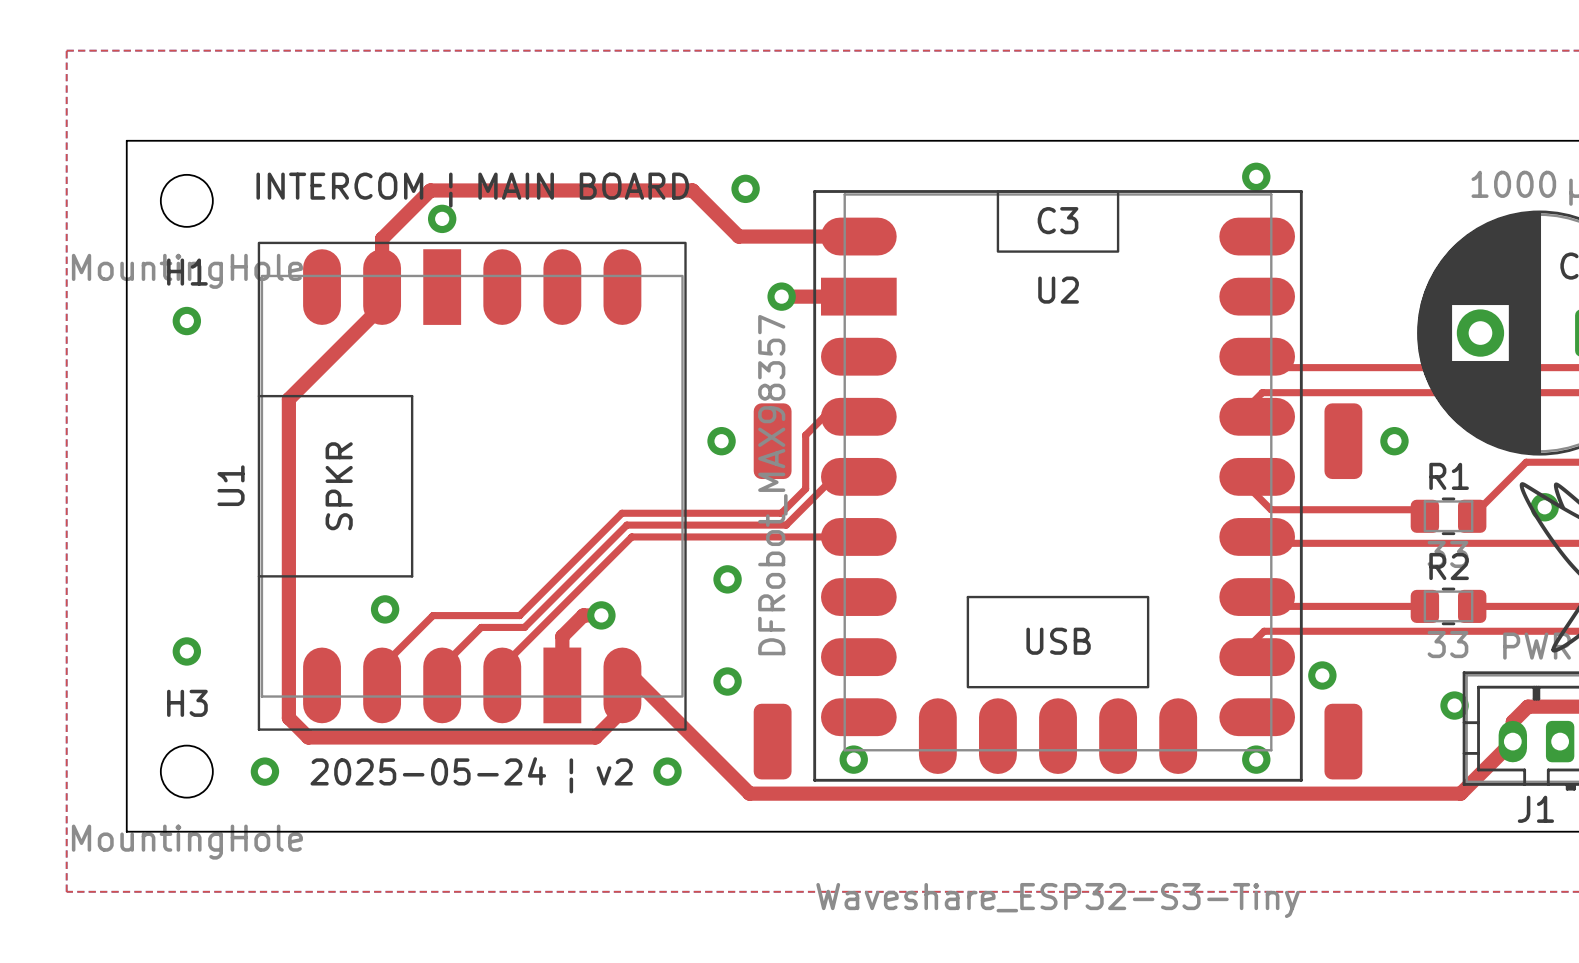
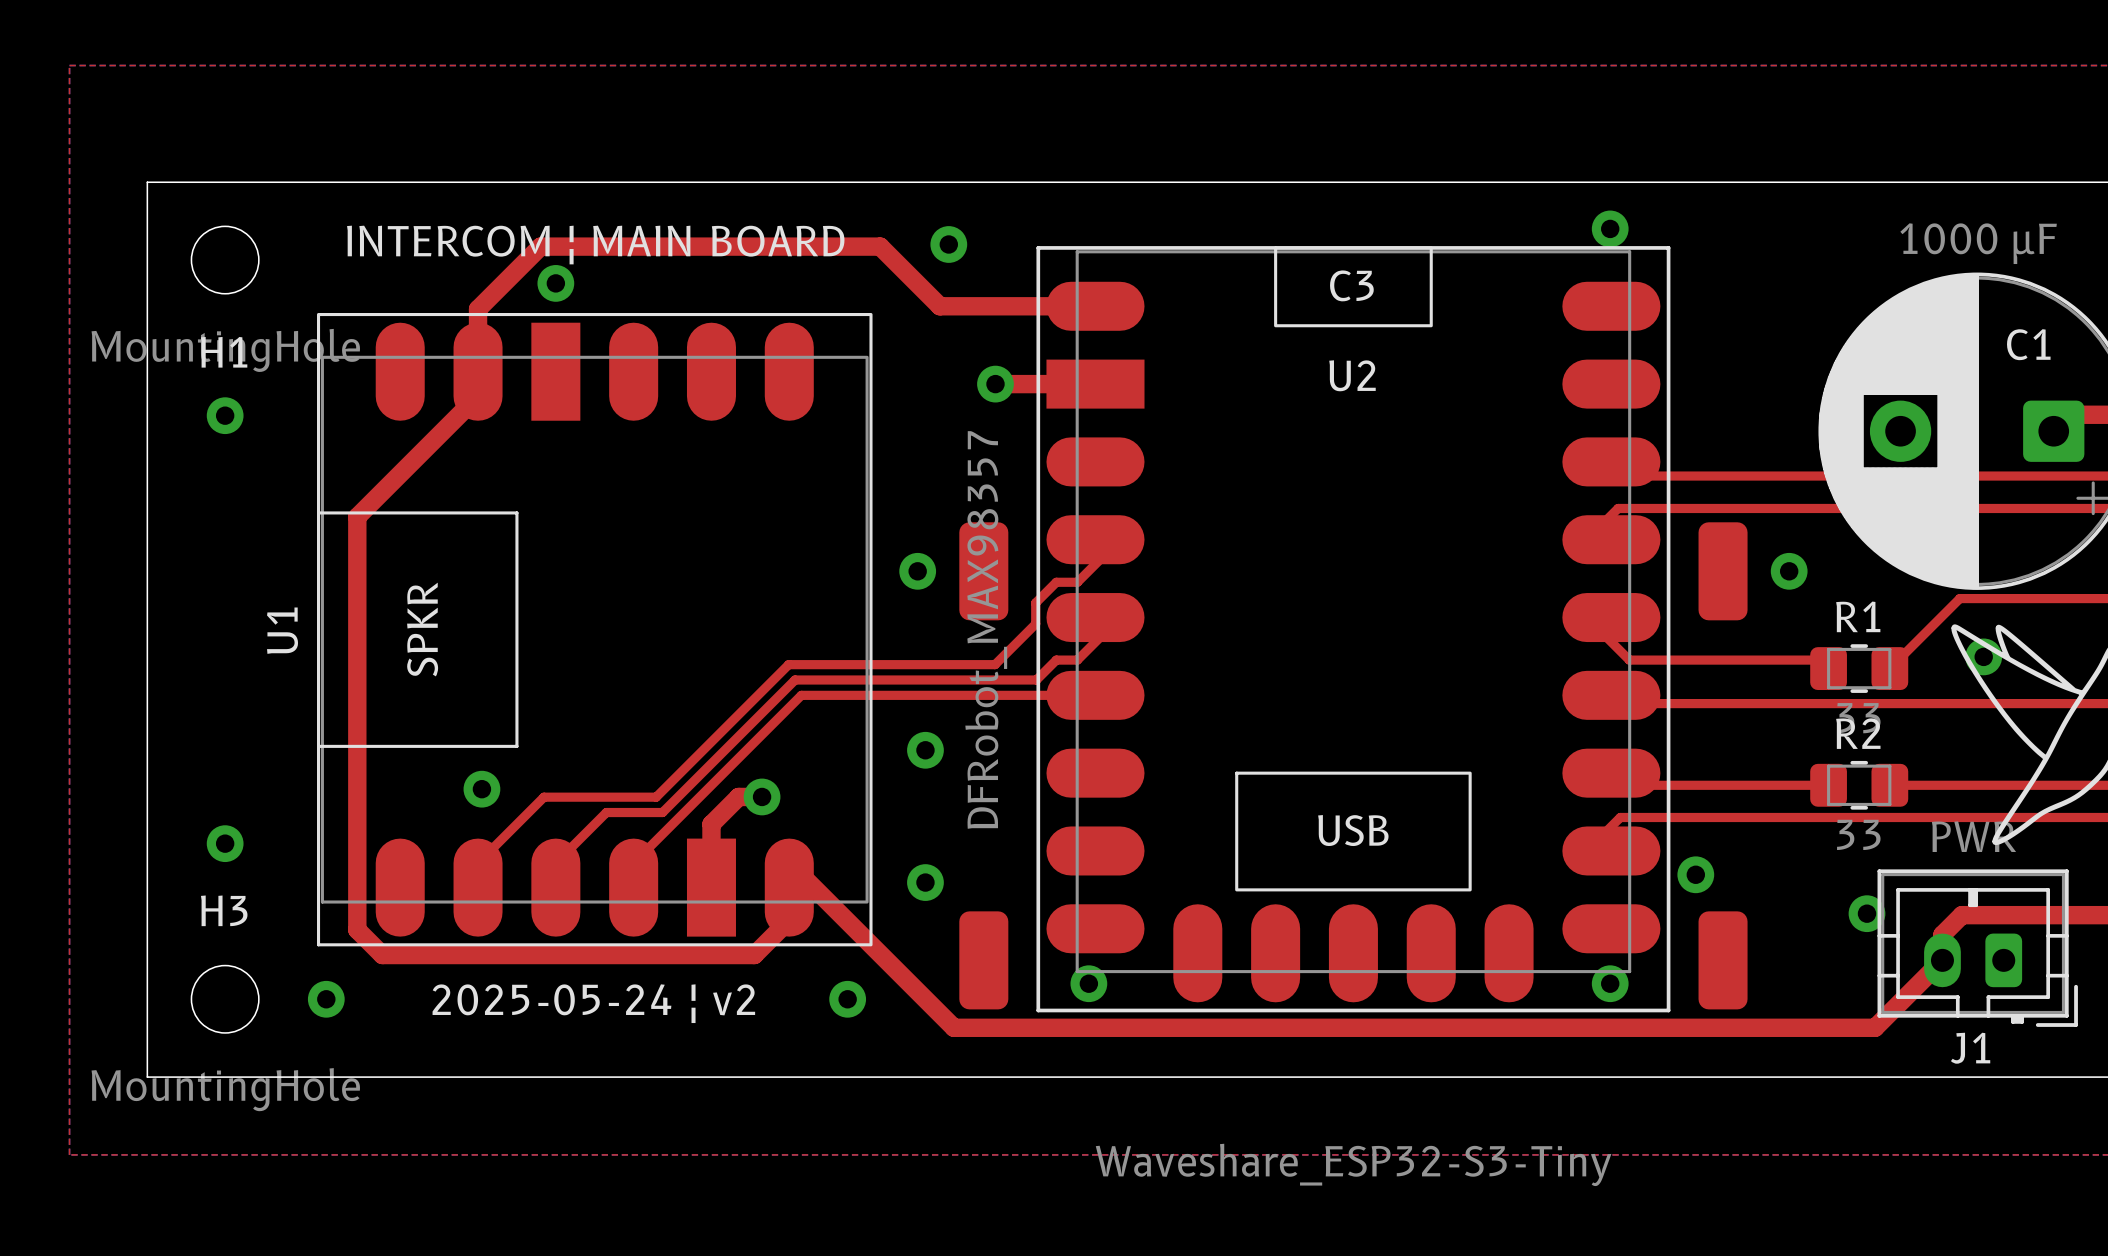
top track: (877, 416) (824, 416) (805, 435) (805, 488) -> (1119, 539) (1077, 582) (1056, 582) (1035, 602) (1035, 624) (1026, 633)
top track: (877, 476) (834, 476) (786, 525) -> (1119, 617) (1077, 660) (1056, 660) (1036, 680) (1001, 680)

